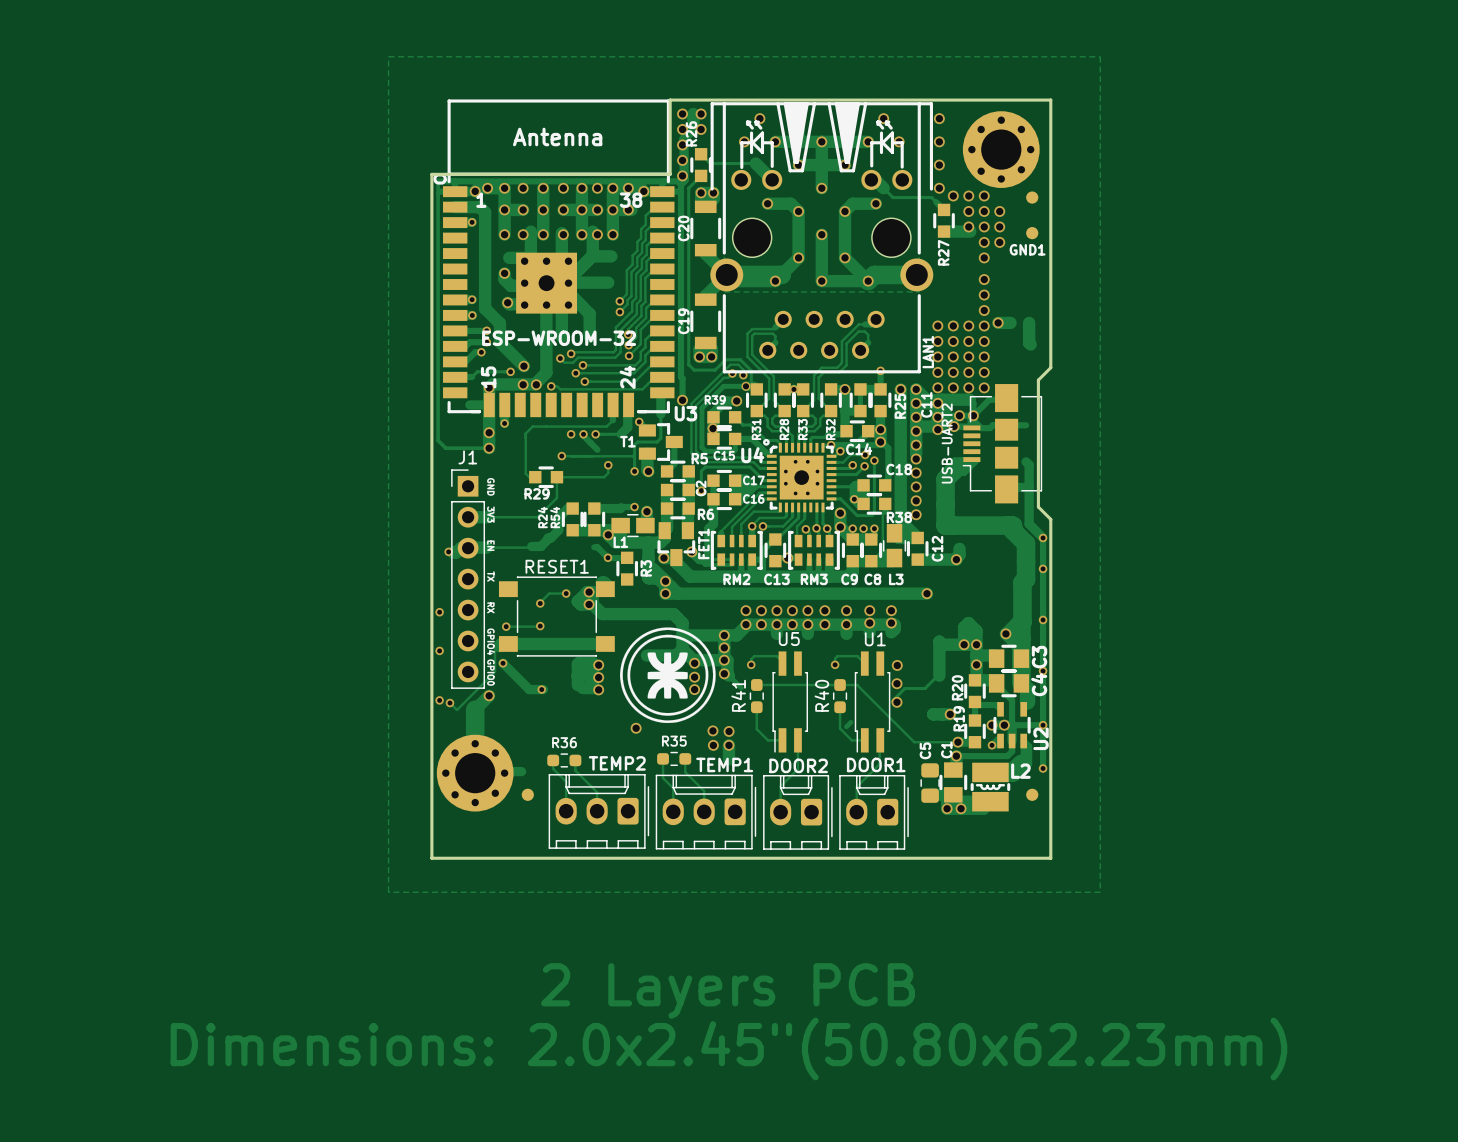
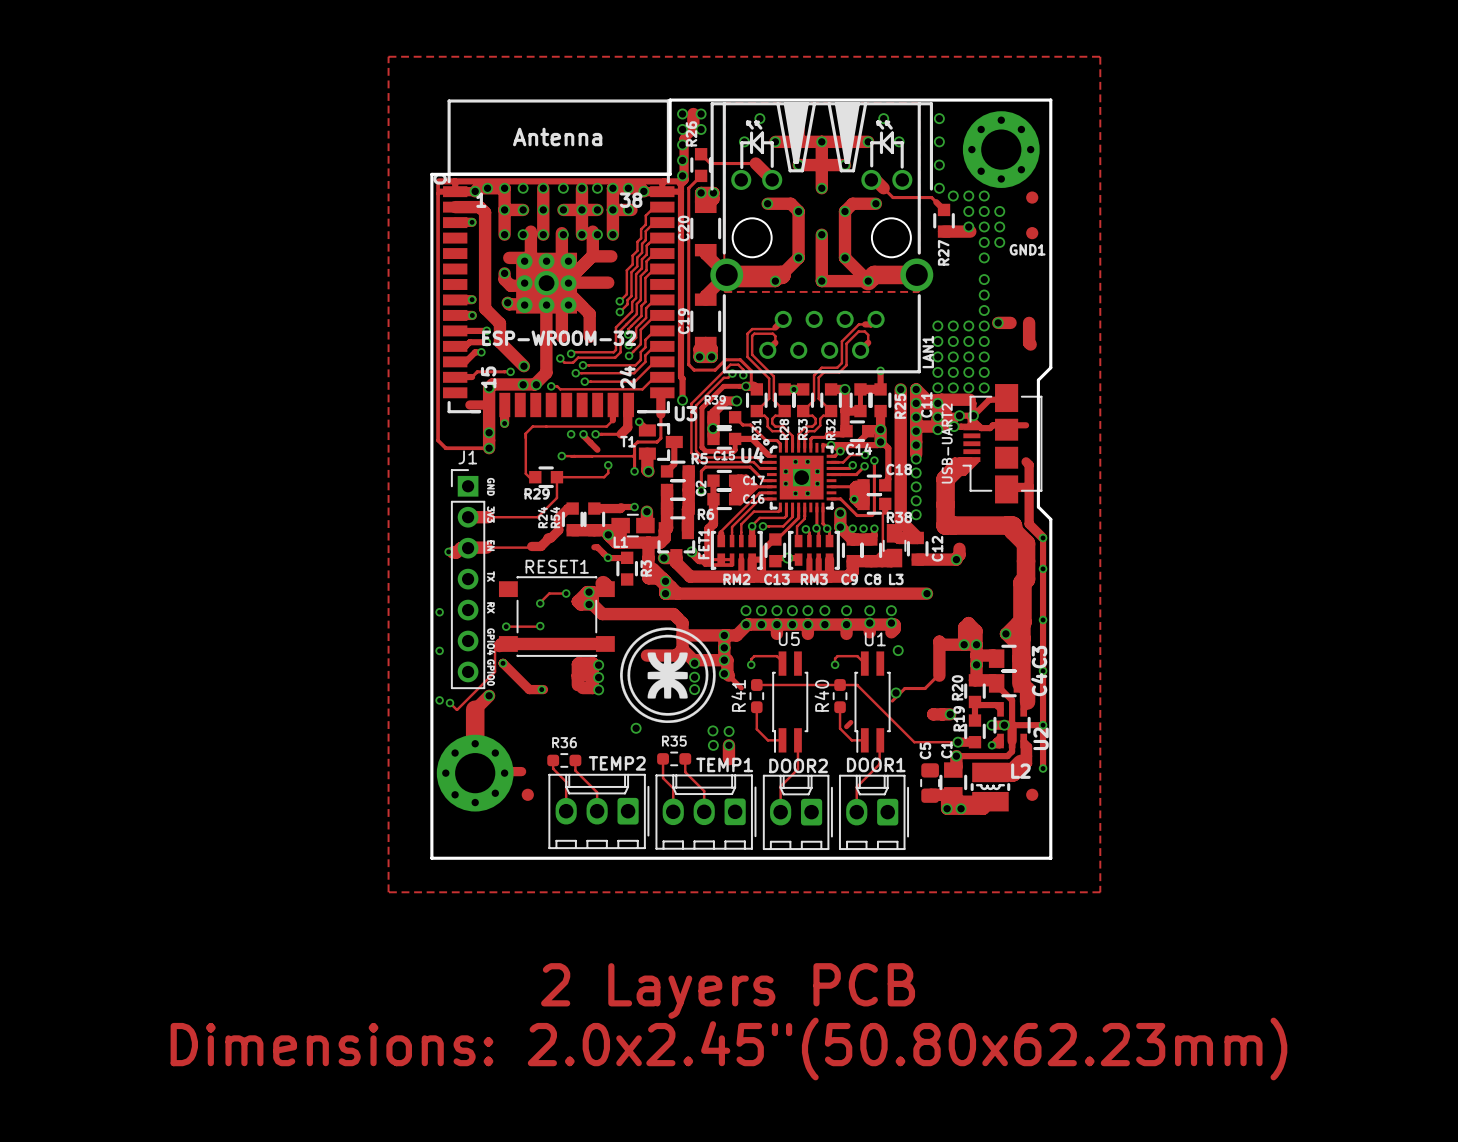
via: none -> (898, 650)
via: (897, 665) -> none
via: (896, 683) -> none
via: none -> (896, 692)
via: (896, 702) -> none

